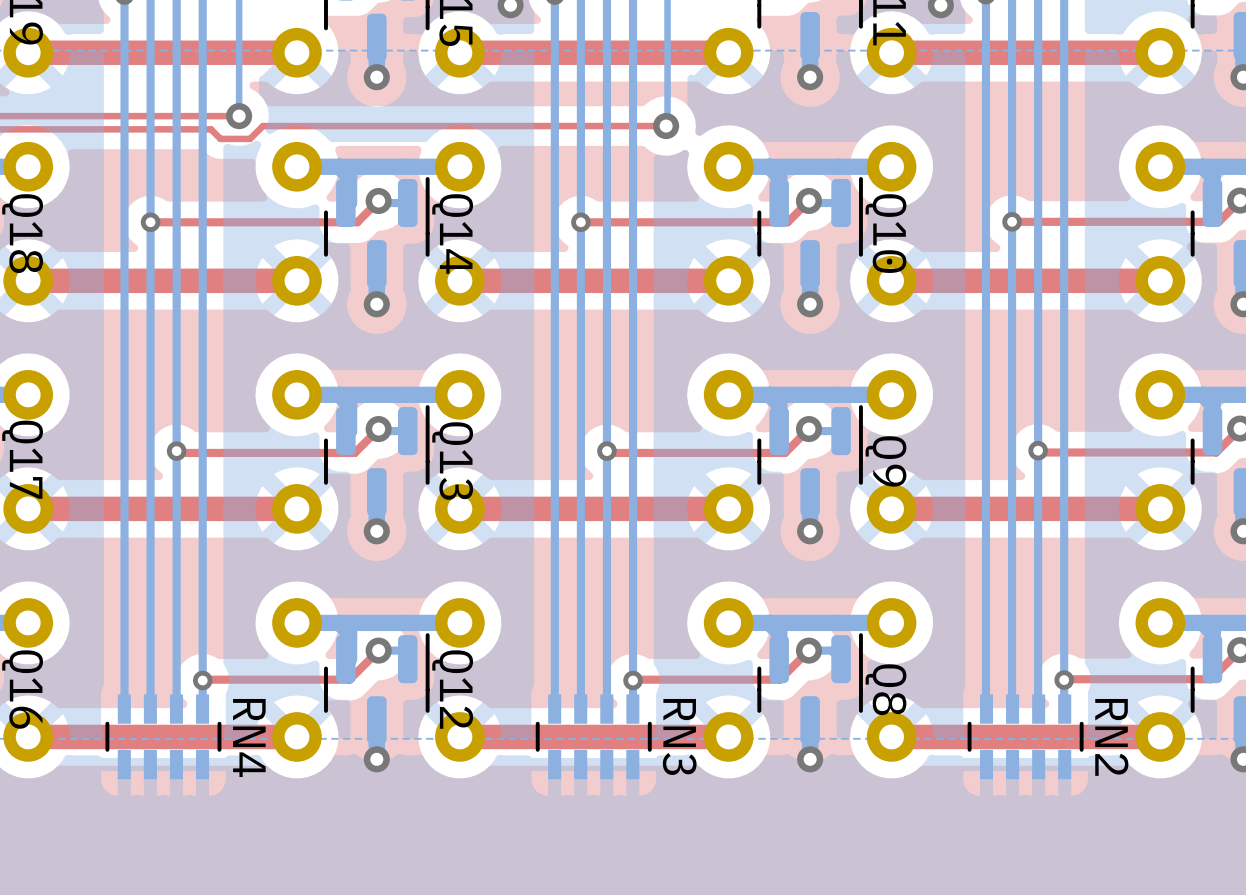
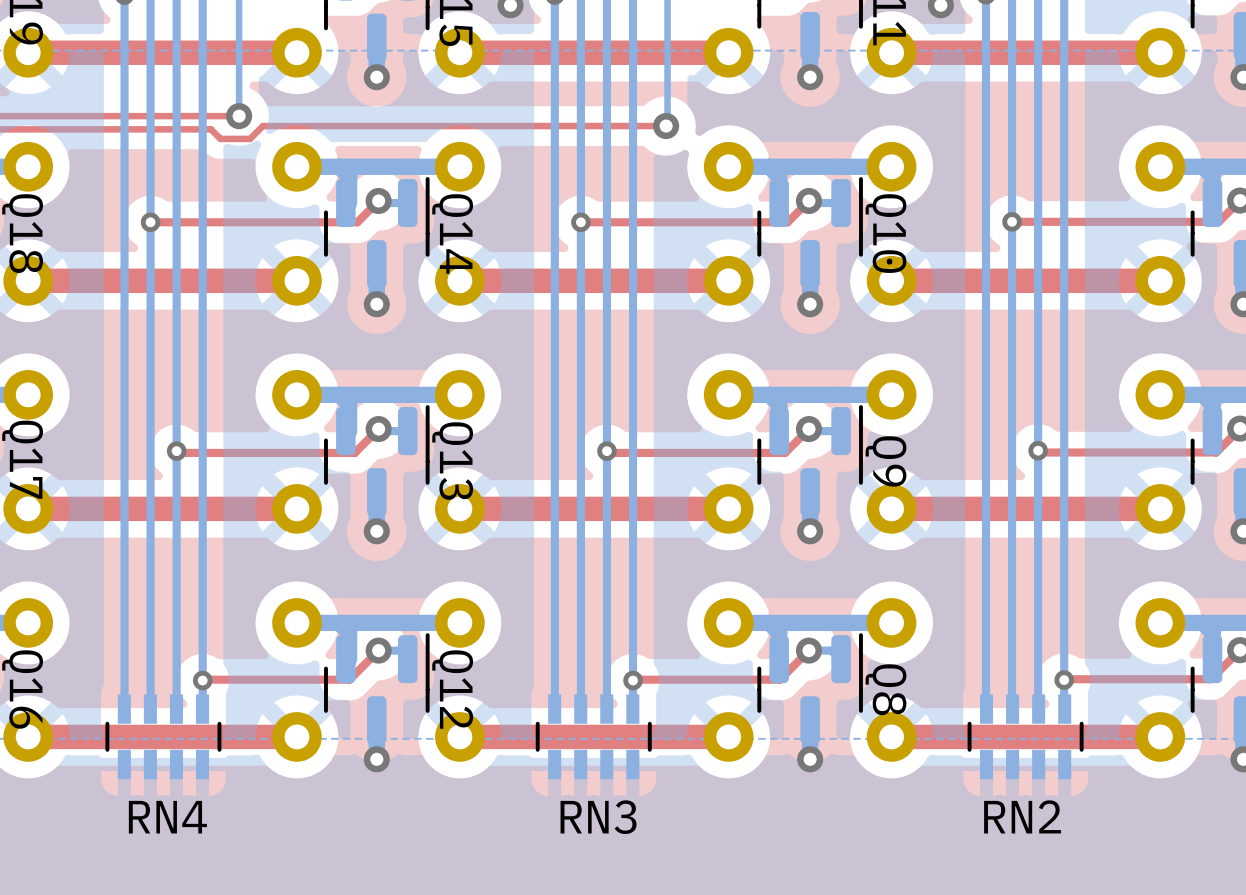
RN3 name rotation: 0° (679, 736) -> 90° counterclockwise (598, 817)
RN2 name rotation: 0° (1111, 737) -> 90° counterclockwise (1022, 816)
RN2 name position: RN2 (1111, 737) -> RN2 (1022, 816)
RN4 name rotation: 0° (249, 738) -> 90° counterclockwise (167, 817)

